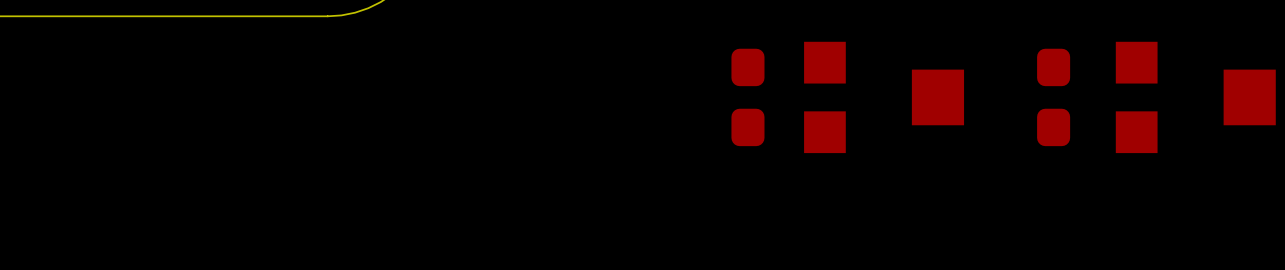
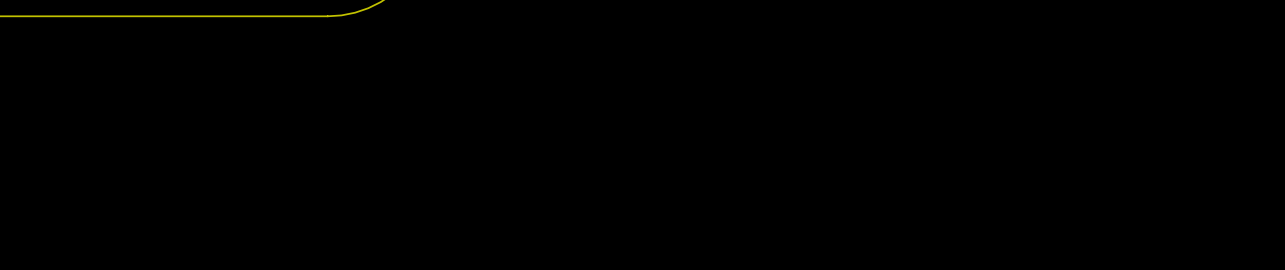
part: (747, 97) -> none
part: (884, 97) -> none
part: (1053, 97) -> none
part: (1195, 97) -> none

